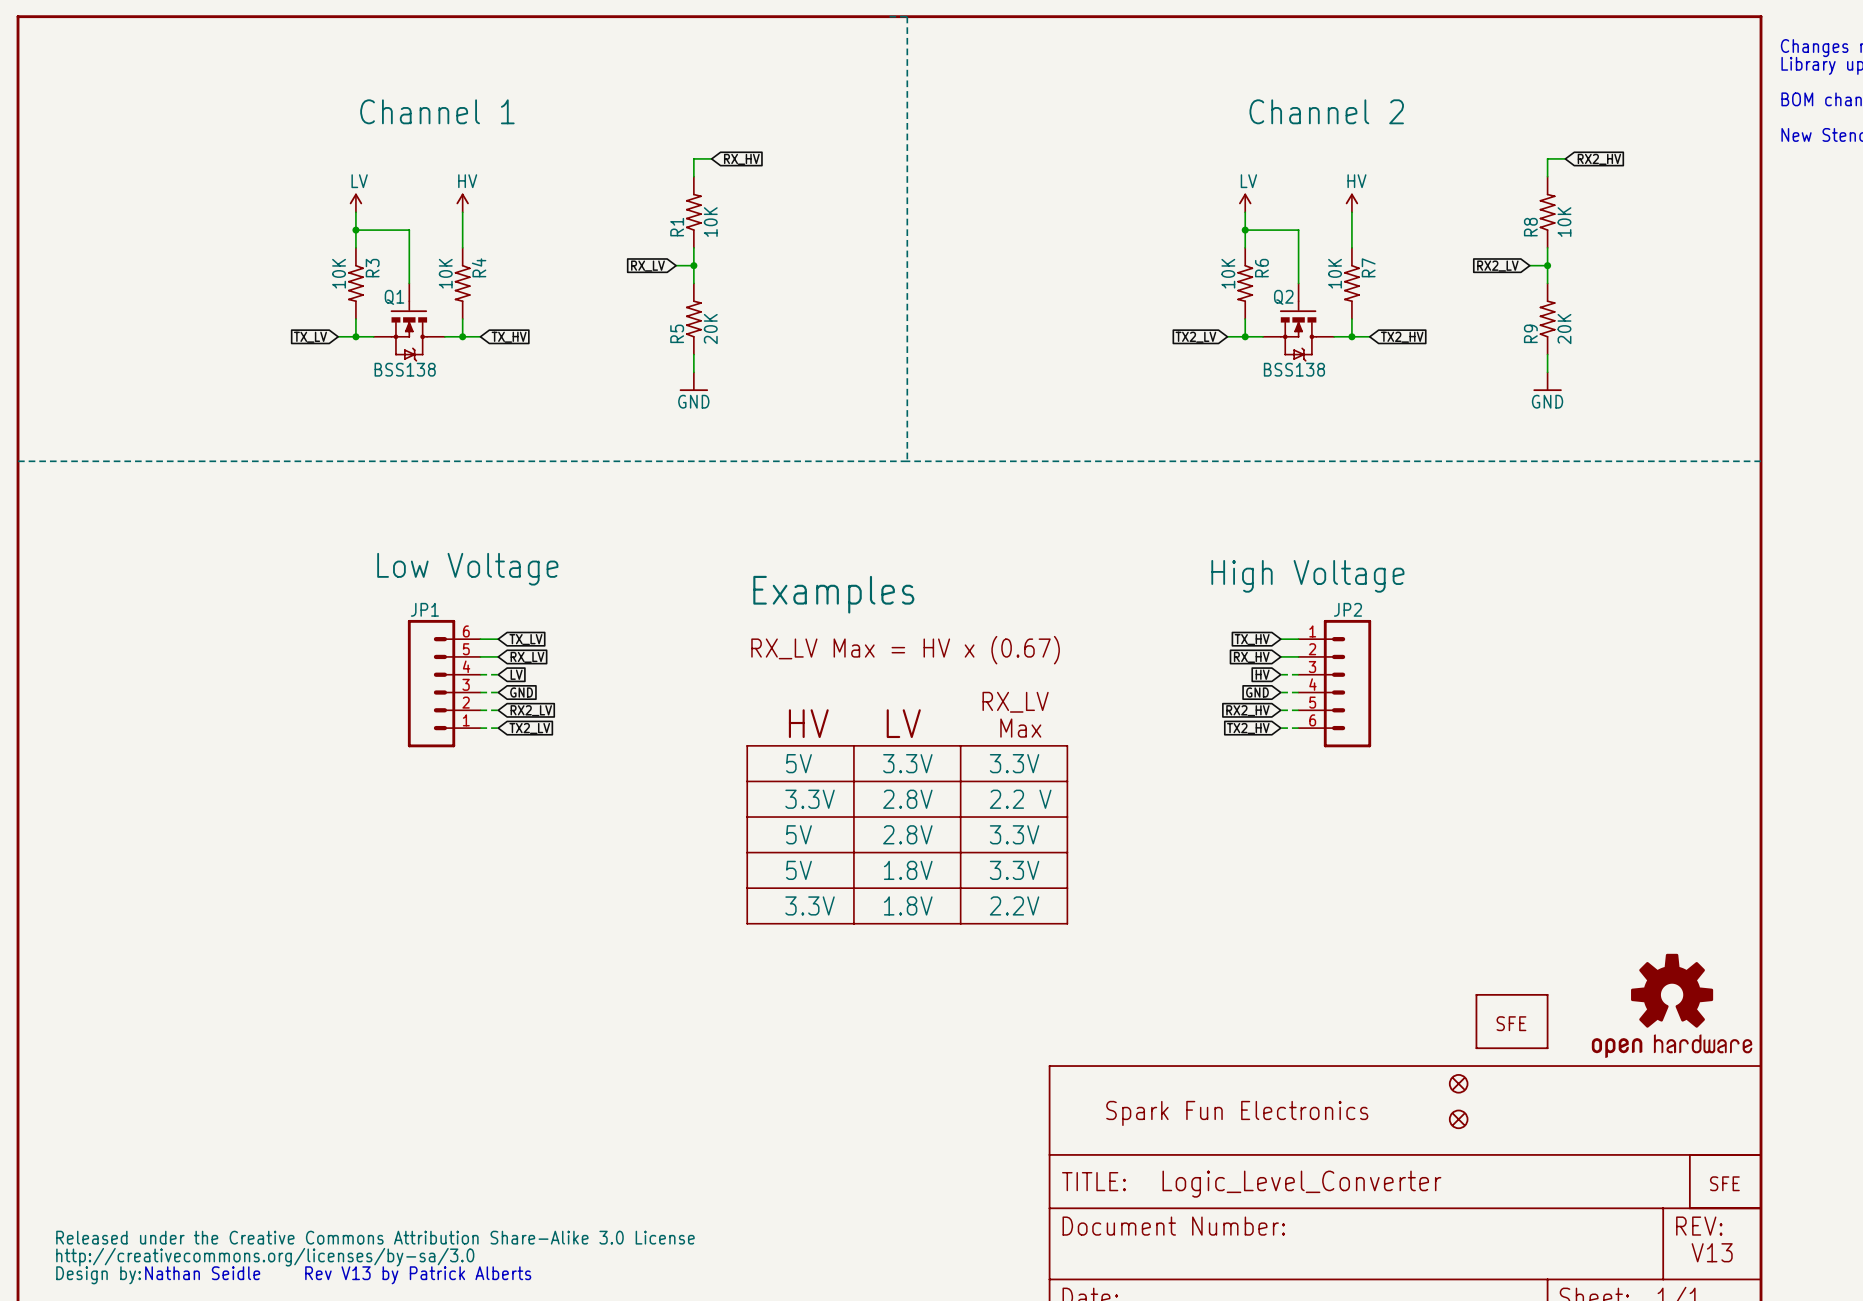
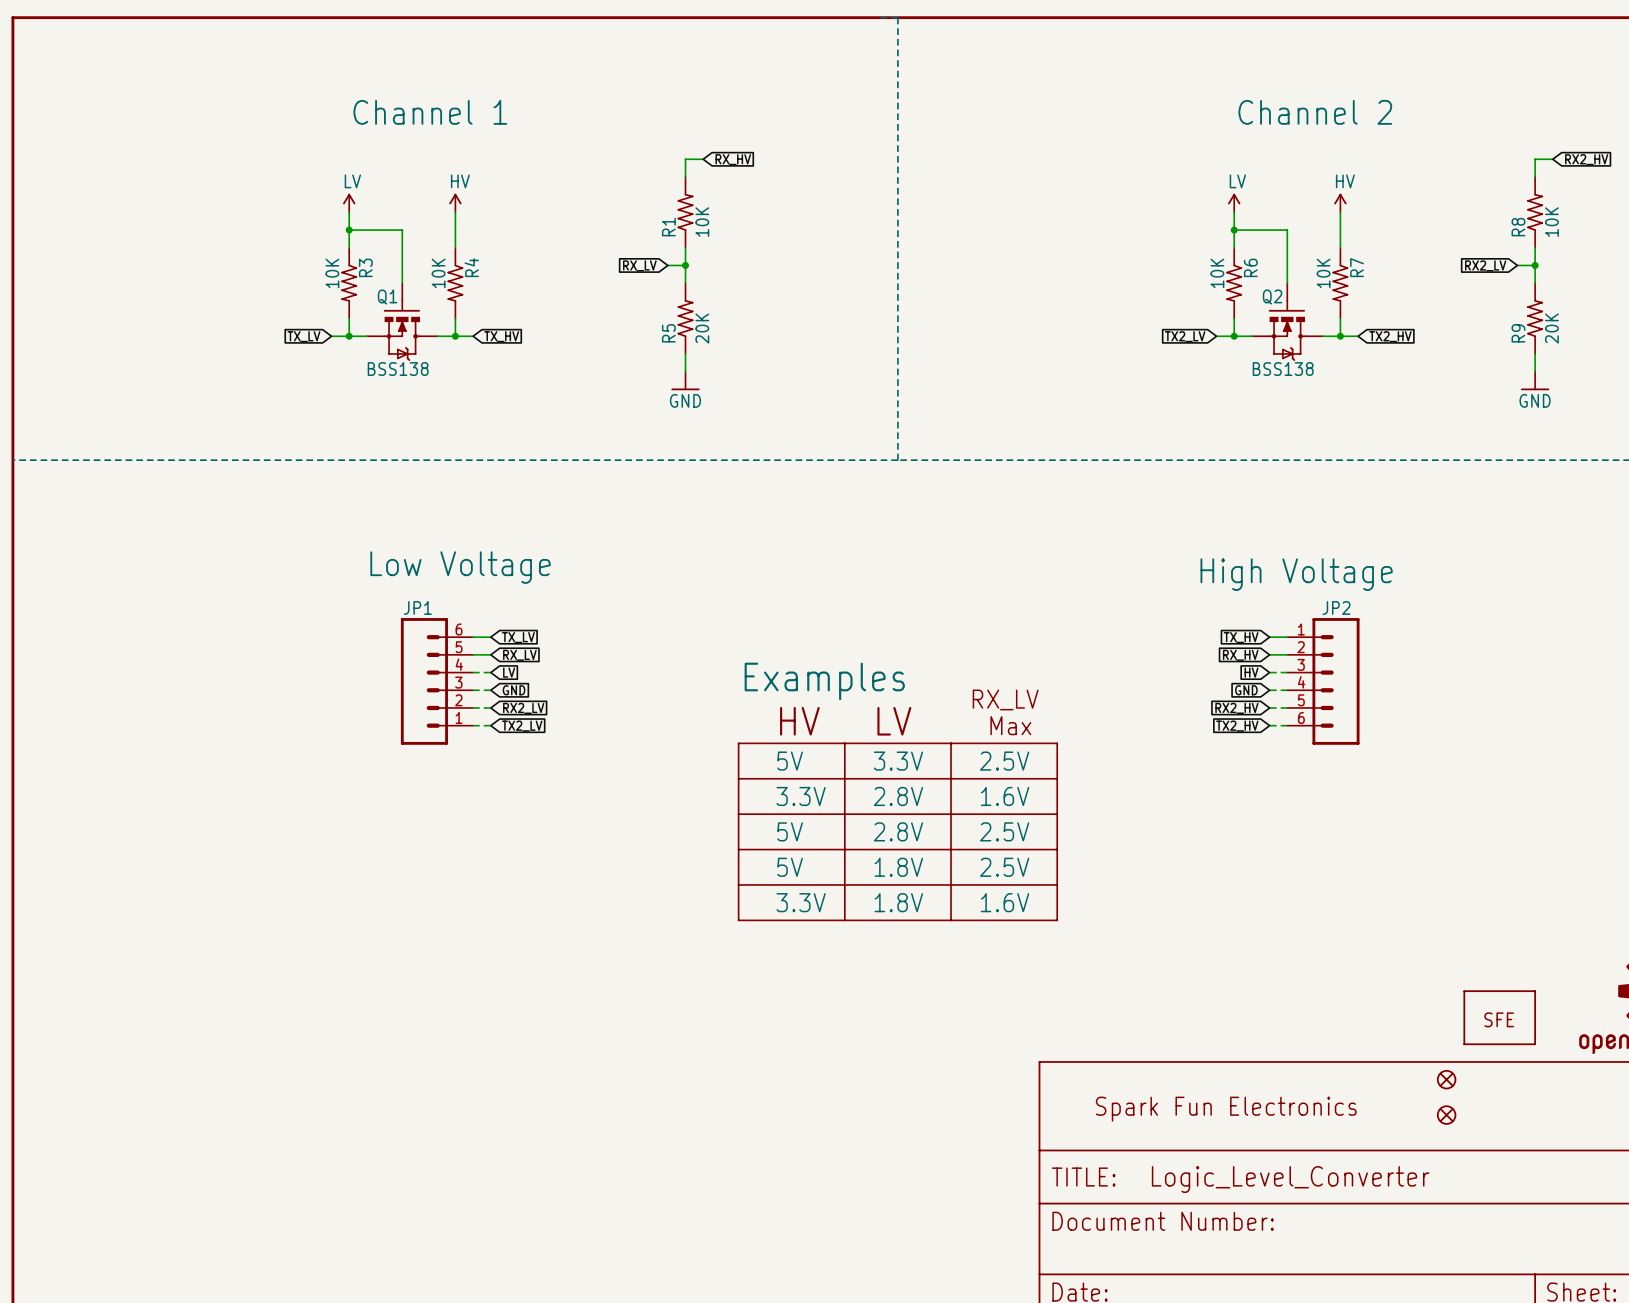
text position: Examples (833, 594) -> Examples (824, 681)
text: RX_LV Max = HV x (0.67) (905, 650) -> none
text: 3.3V (1014, 763) -> 2.5V (1004, 761)
text: 2.2 V (1020, 799) -> 1.6V (1005, 796)
text: 3.3V (1014, 834) -> 2.5V (1004, 831)
text: 3.3V (1014, 870) -> 2.5V (1004, 867)
text: 2.2V (1014, 905) -> 1.6V (1005, 902)
part: (375, 1257) -> none
text: Nathan Seidle (202, 1273) -> none
text: Rev V13 by Patrick Alberts (418, 1275) -> none

